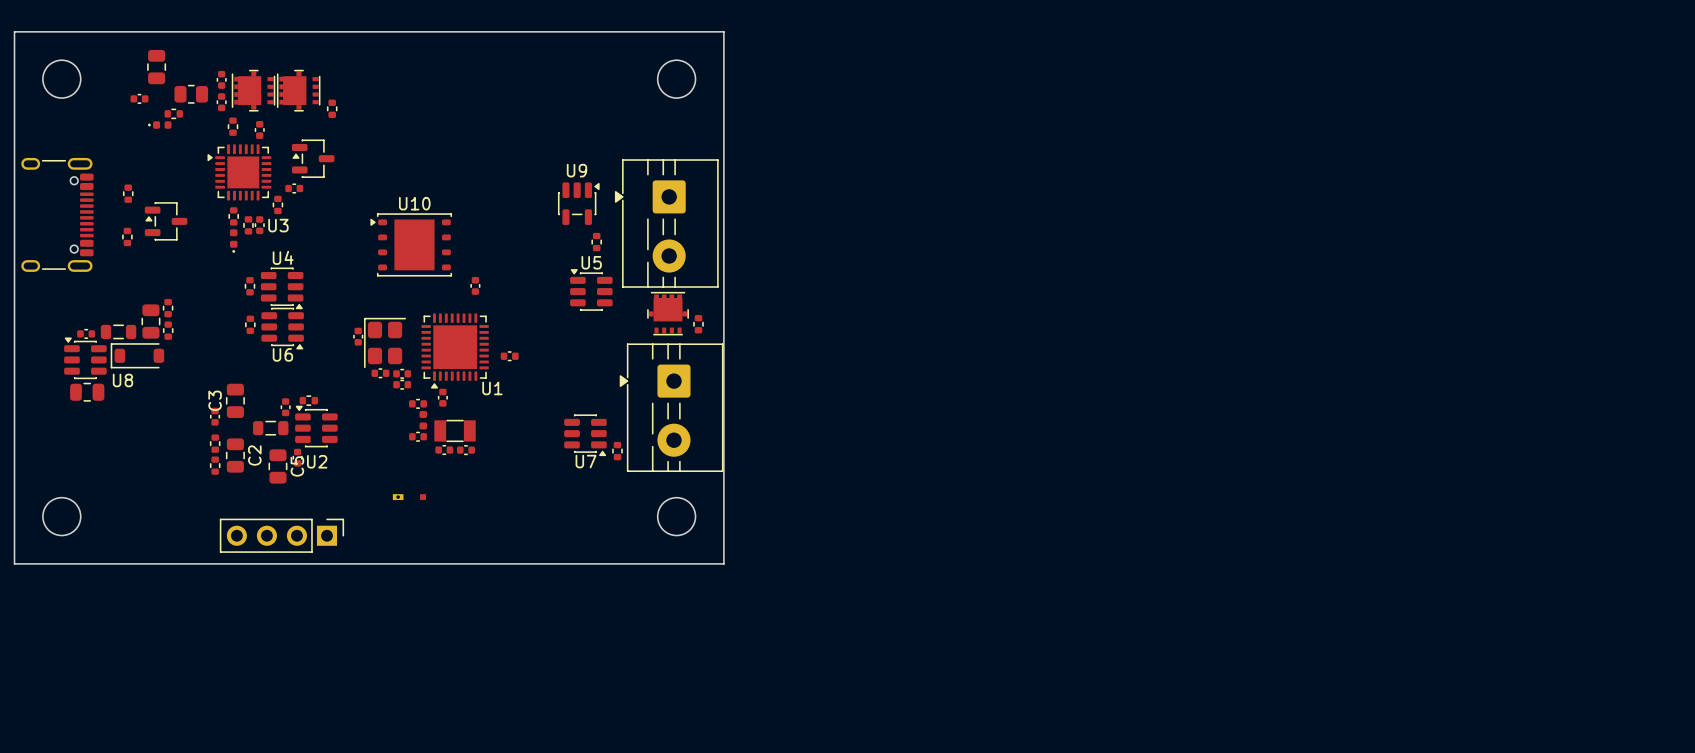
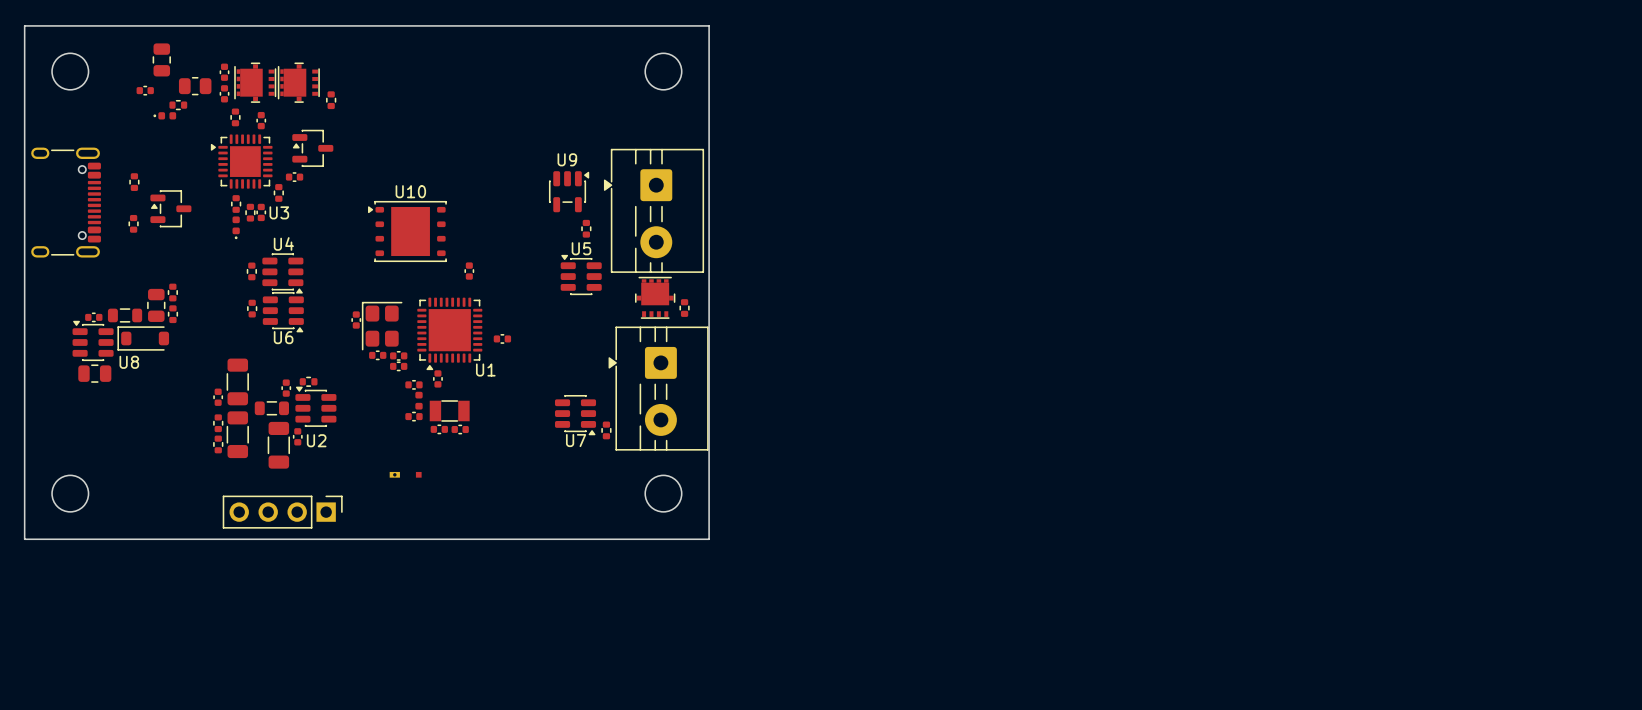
C3: (235, 400) -> none
part: none -> (237, 381)
C2: (235, 455) -> none
part: none -> (237, 434)
C5: (277, 466) -> none
part: none -> (278, 445)

